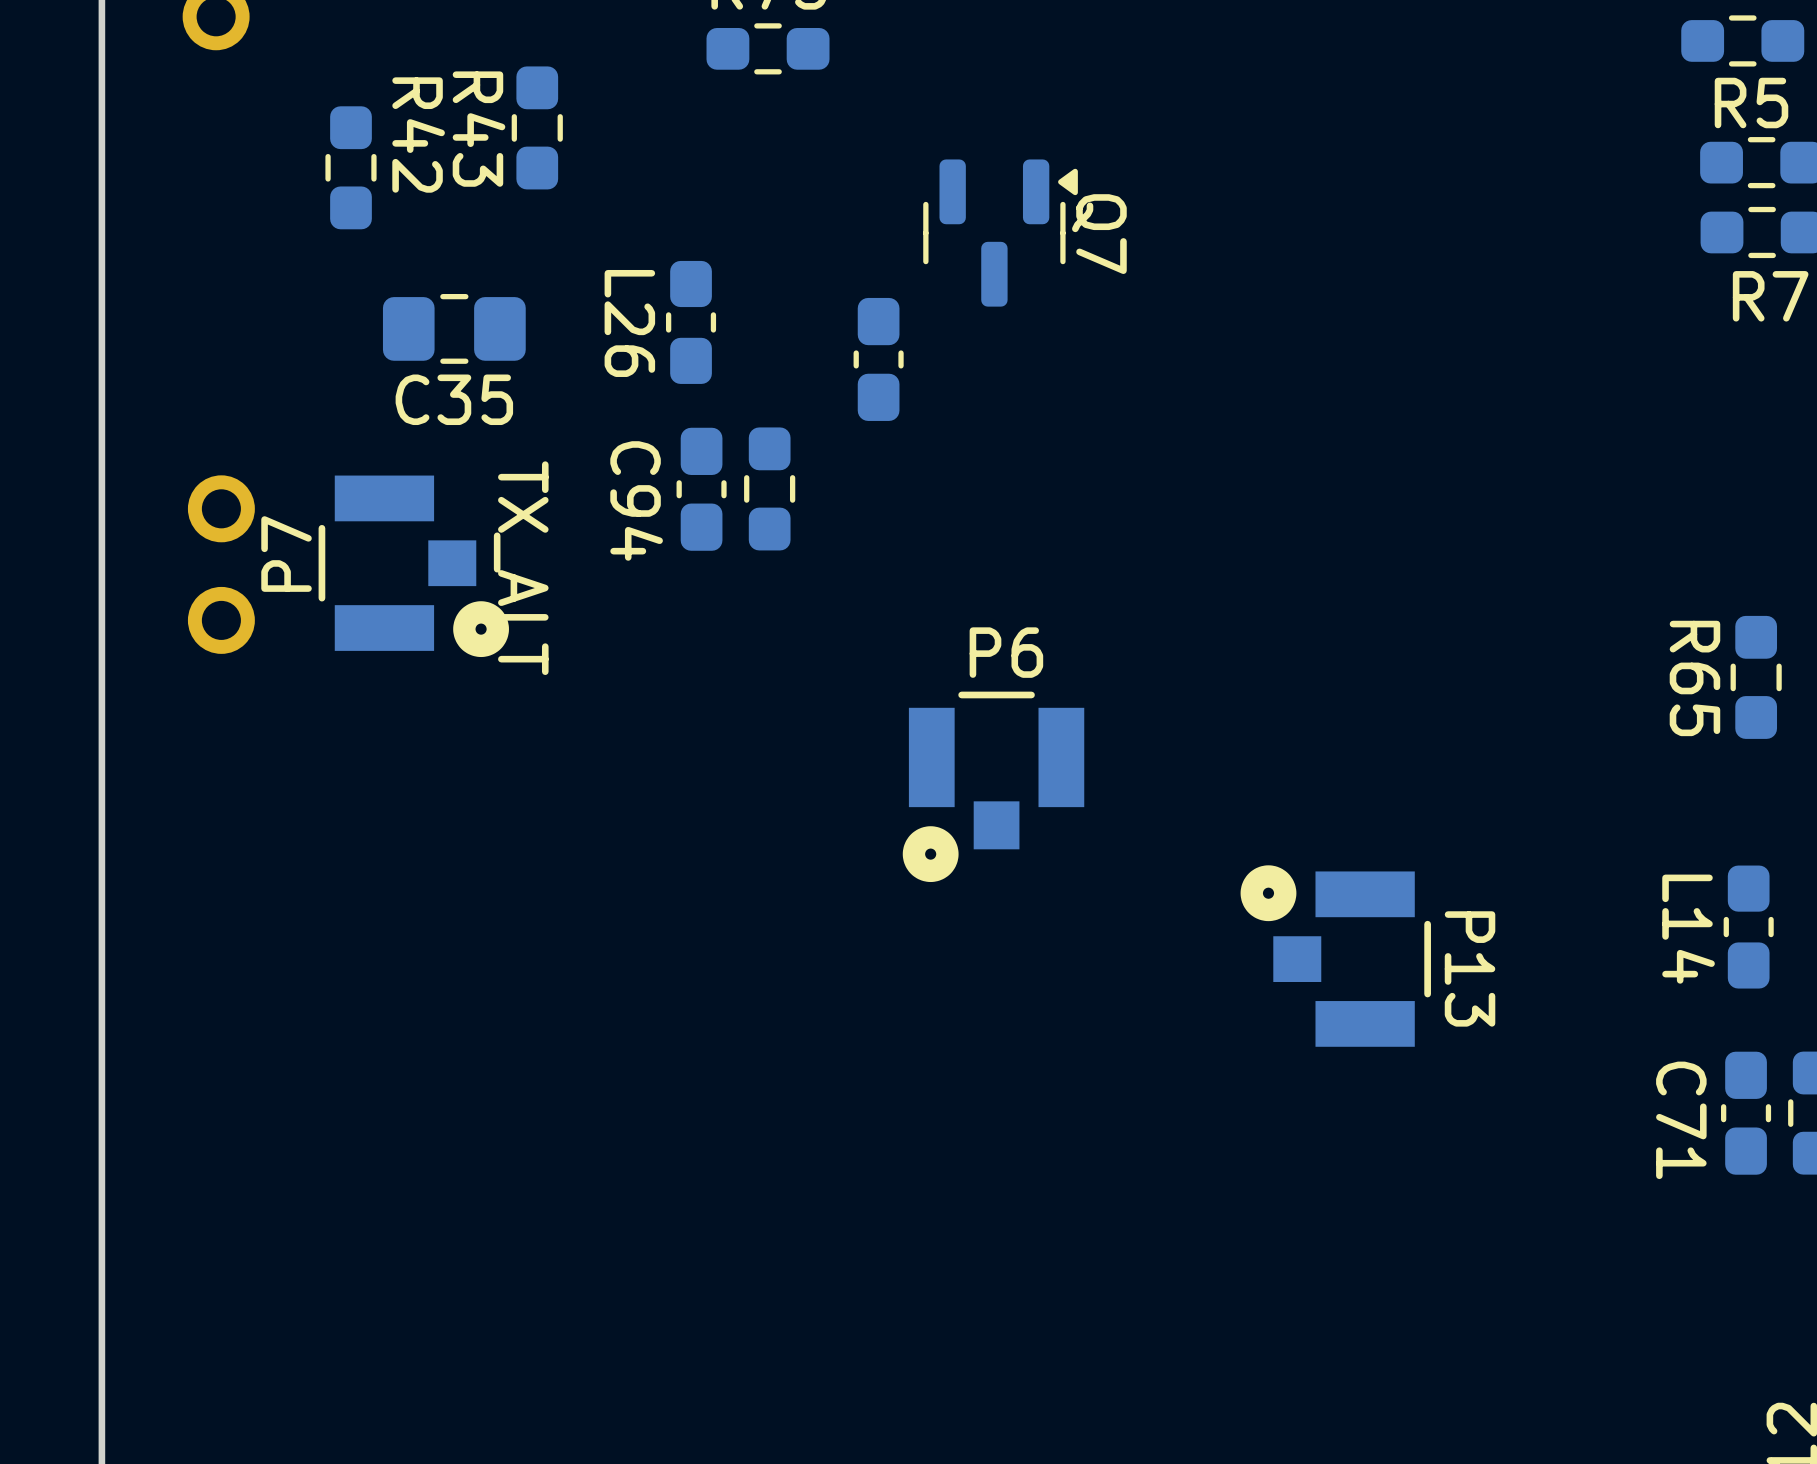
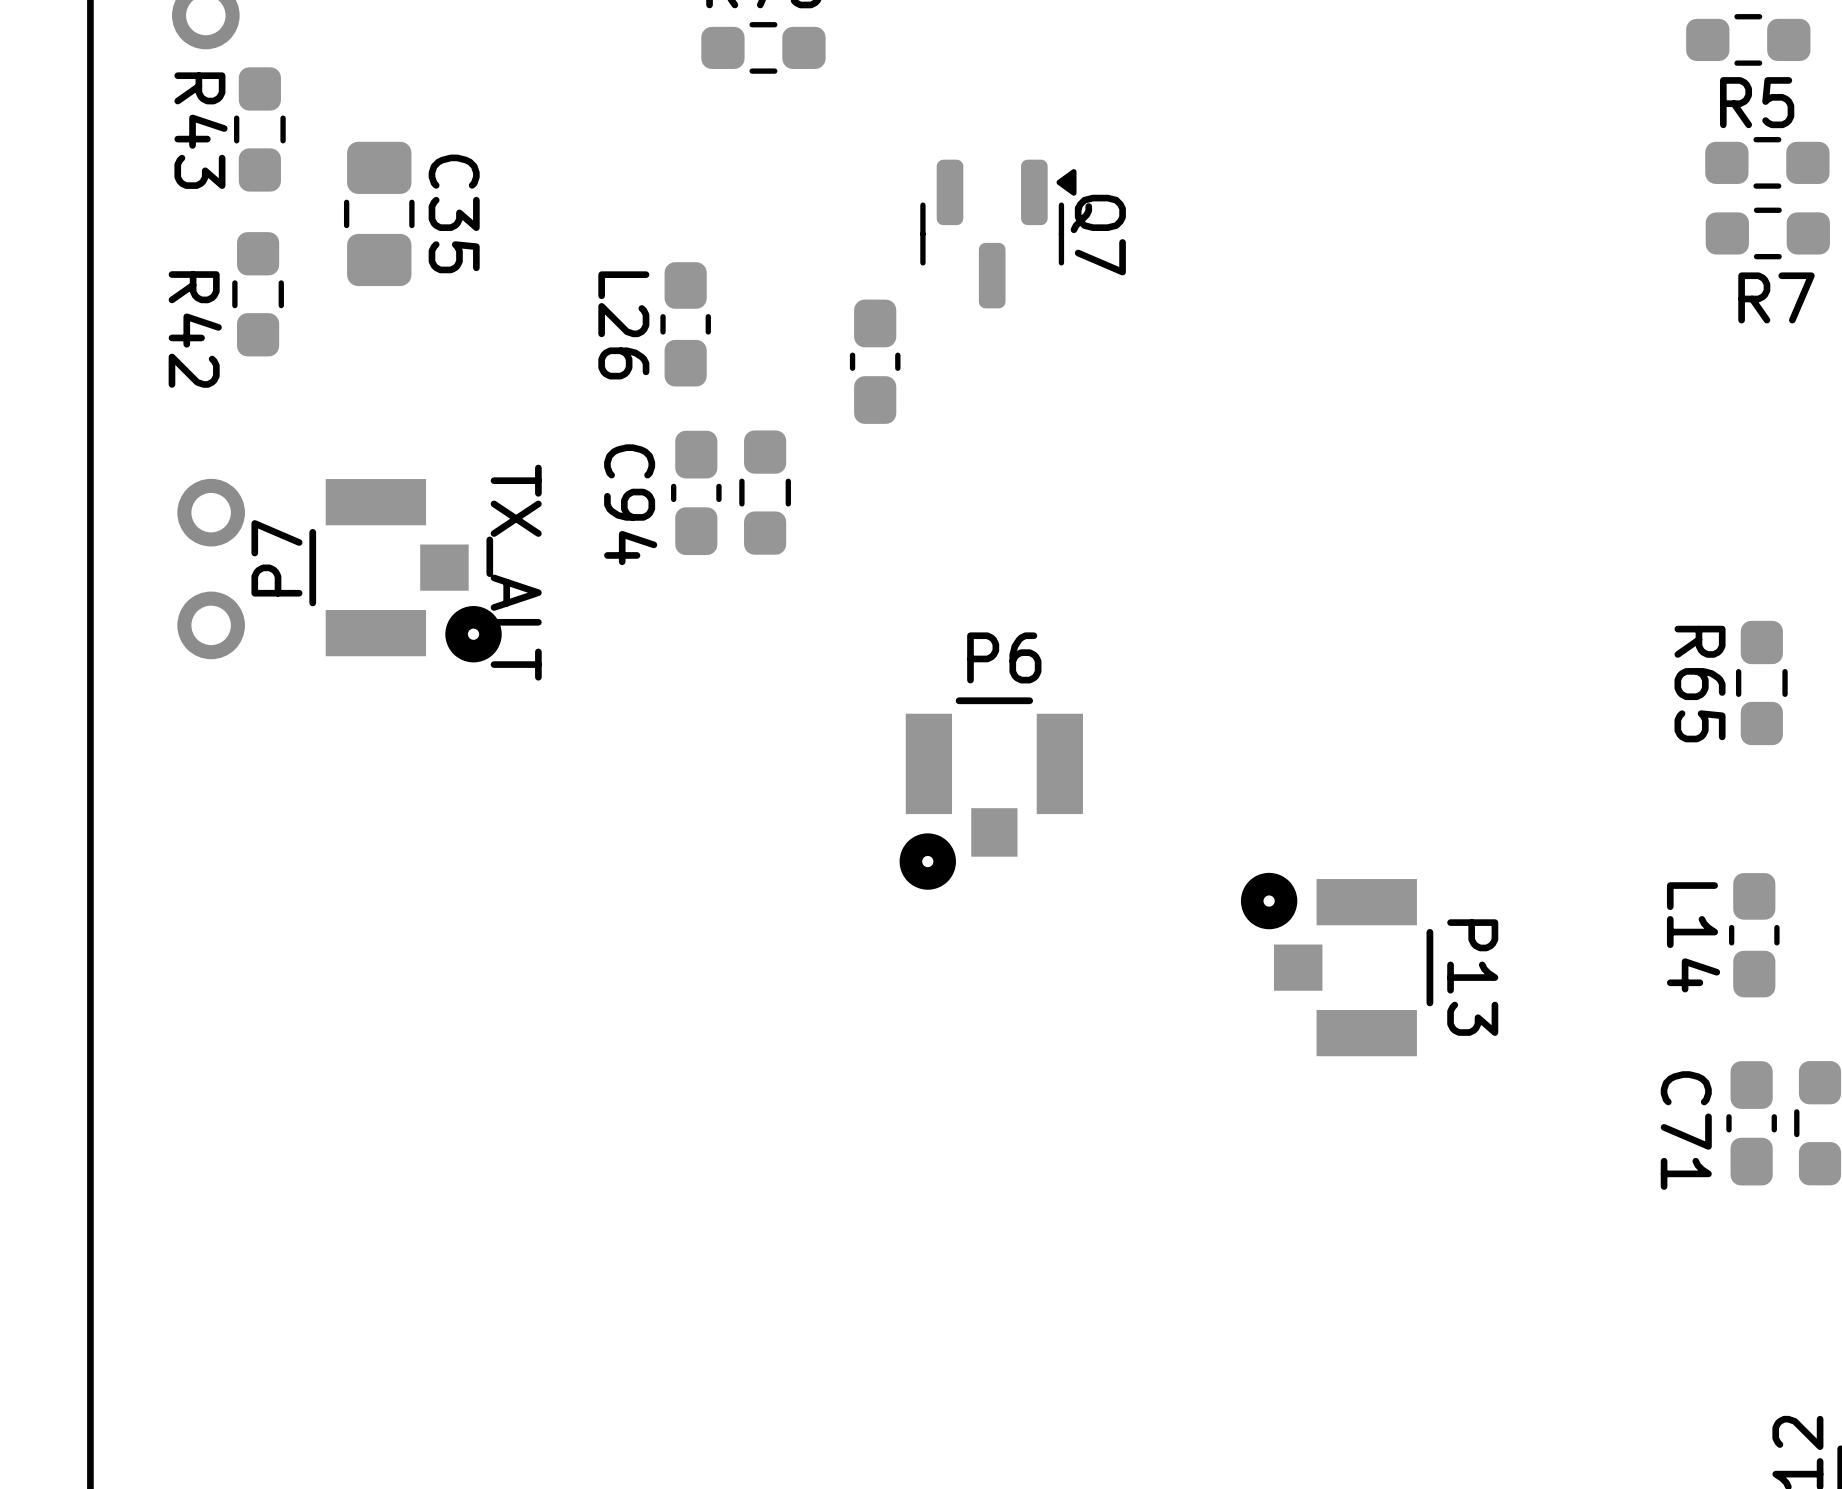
R43 position: (537, 127) -> (259, 129)
R42 name position: R42 (418, 135) -> R42 (195, 329)
R42 position: (351, 167) -> (258, 294)
C35 rotation: 0° (454, 328) -> 90° clockwise (379, 213)
C35 position: (454, 328) -> (379, 213)
C35 name position: C35 (454, 399) -> C35 (454, 213)

